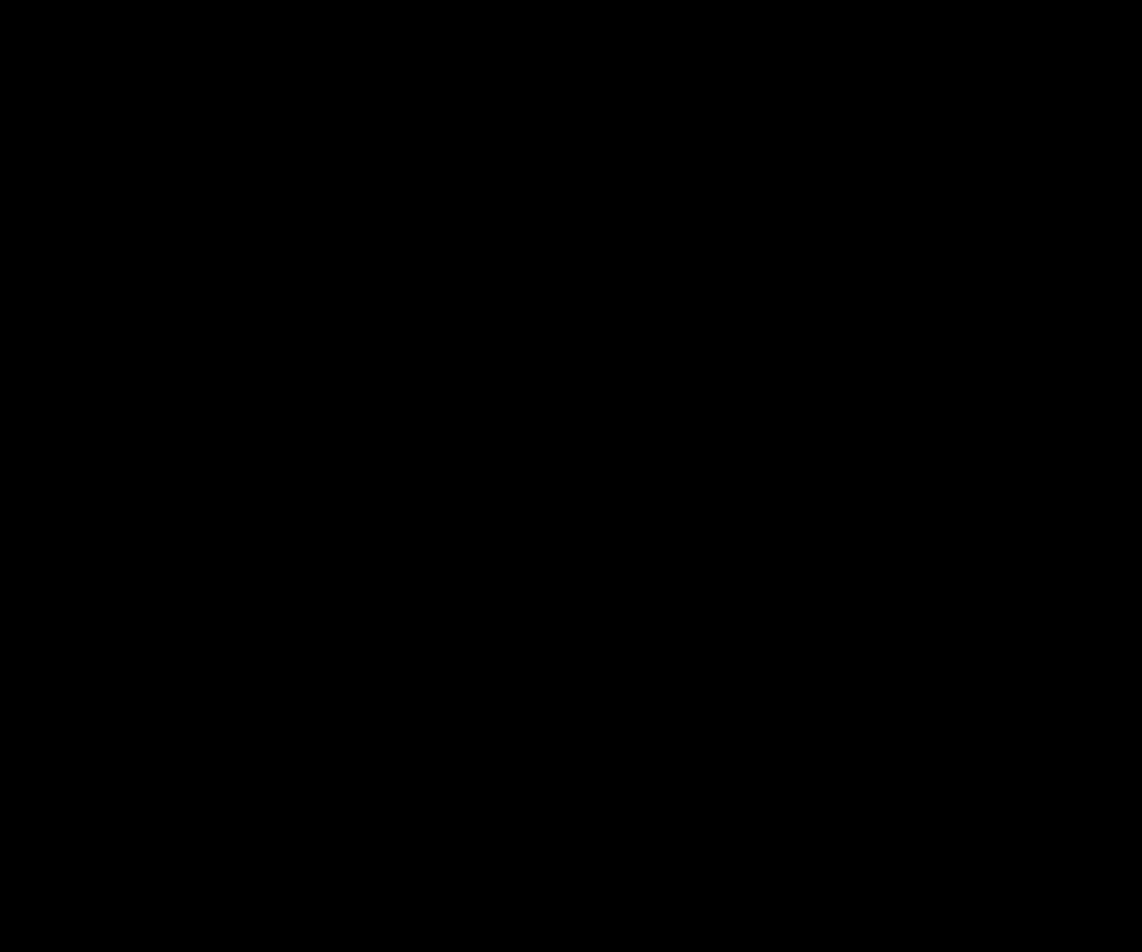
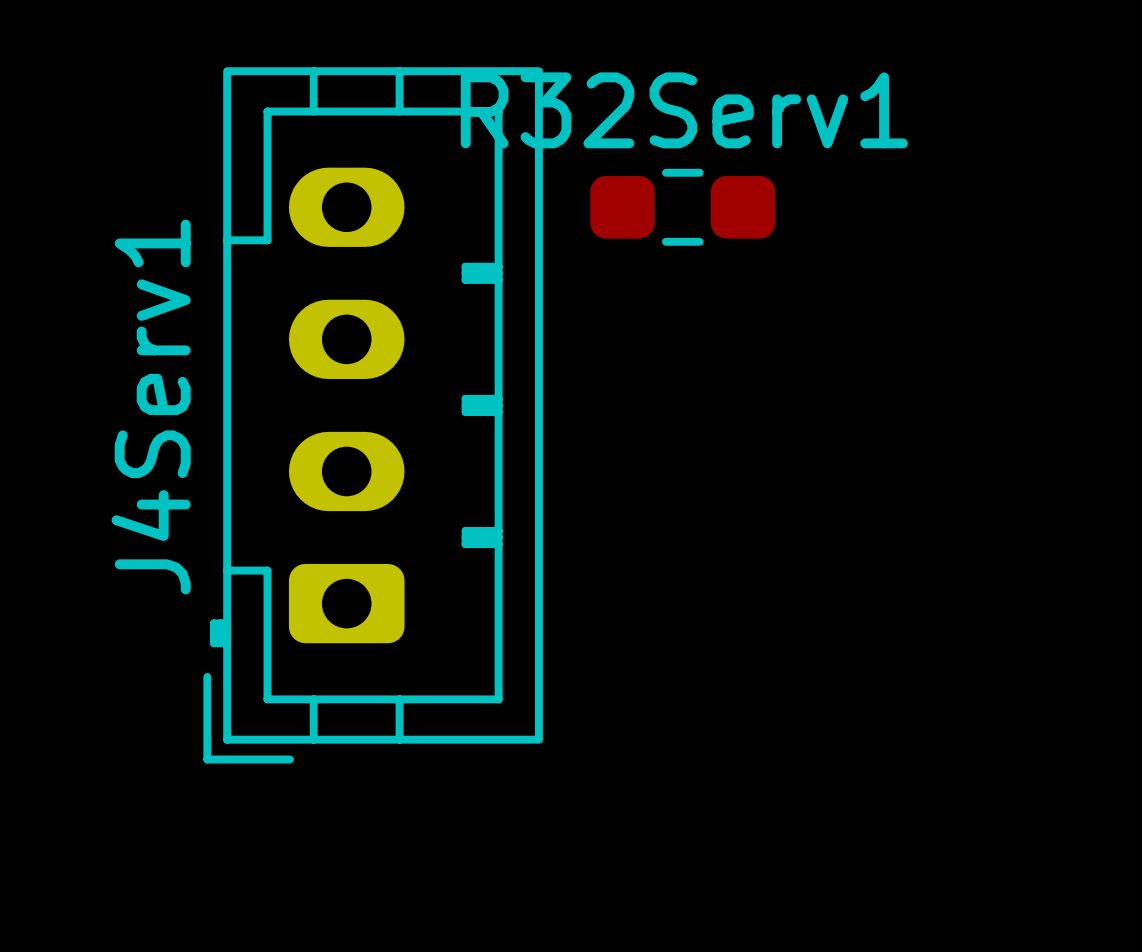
R32Serv1: none -> (682, 207)
J4Serv1: none -> (373, 415)

